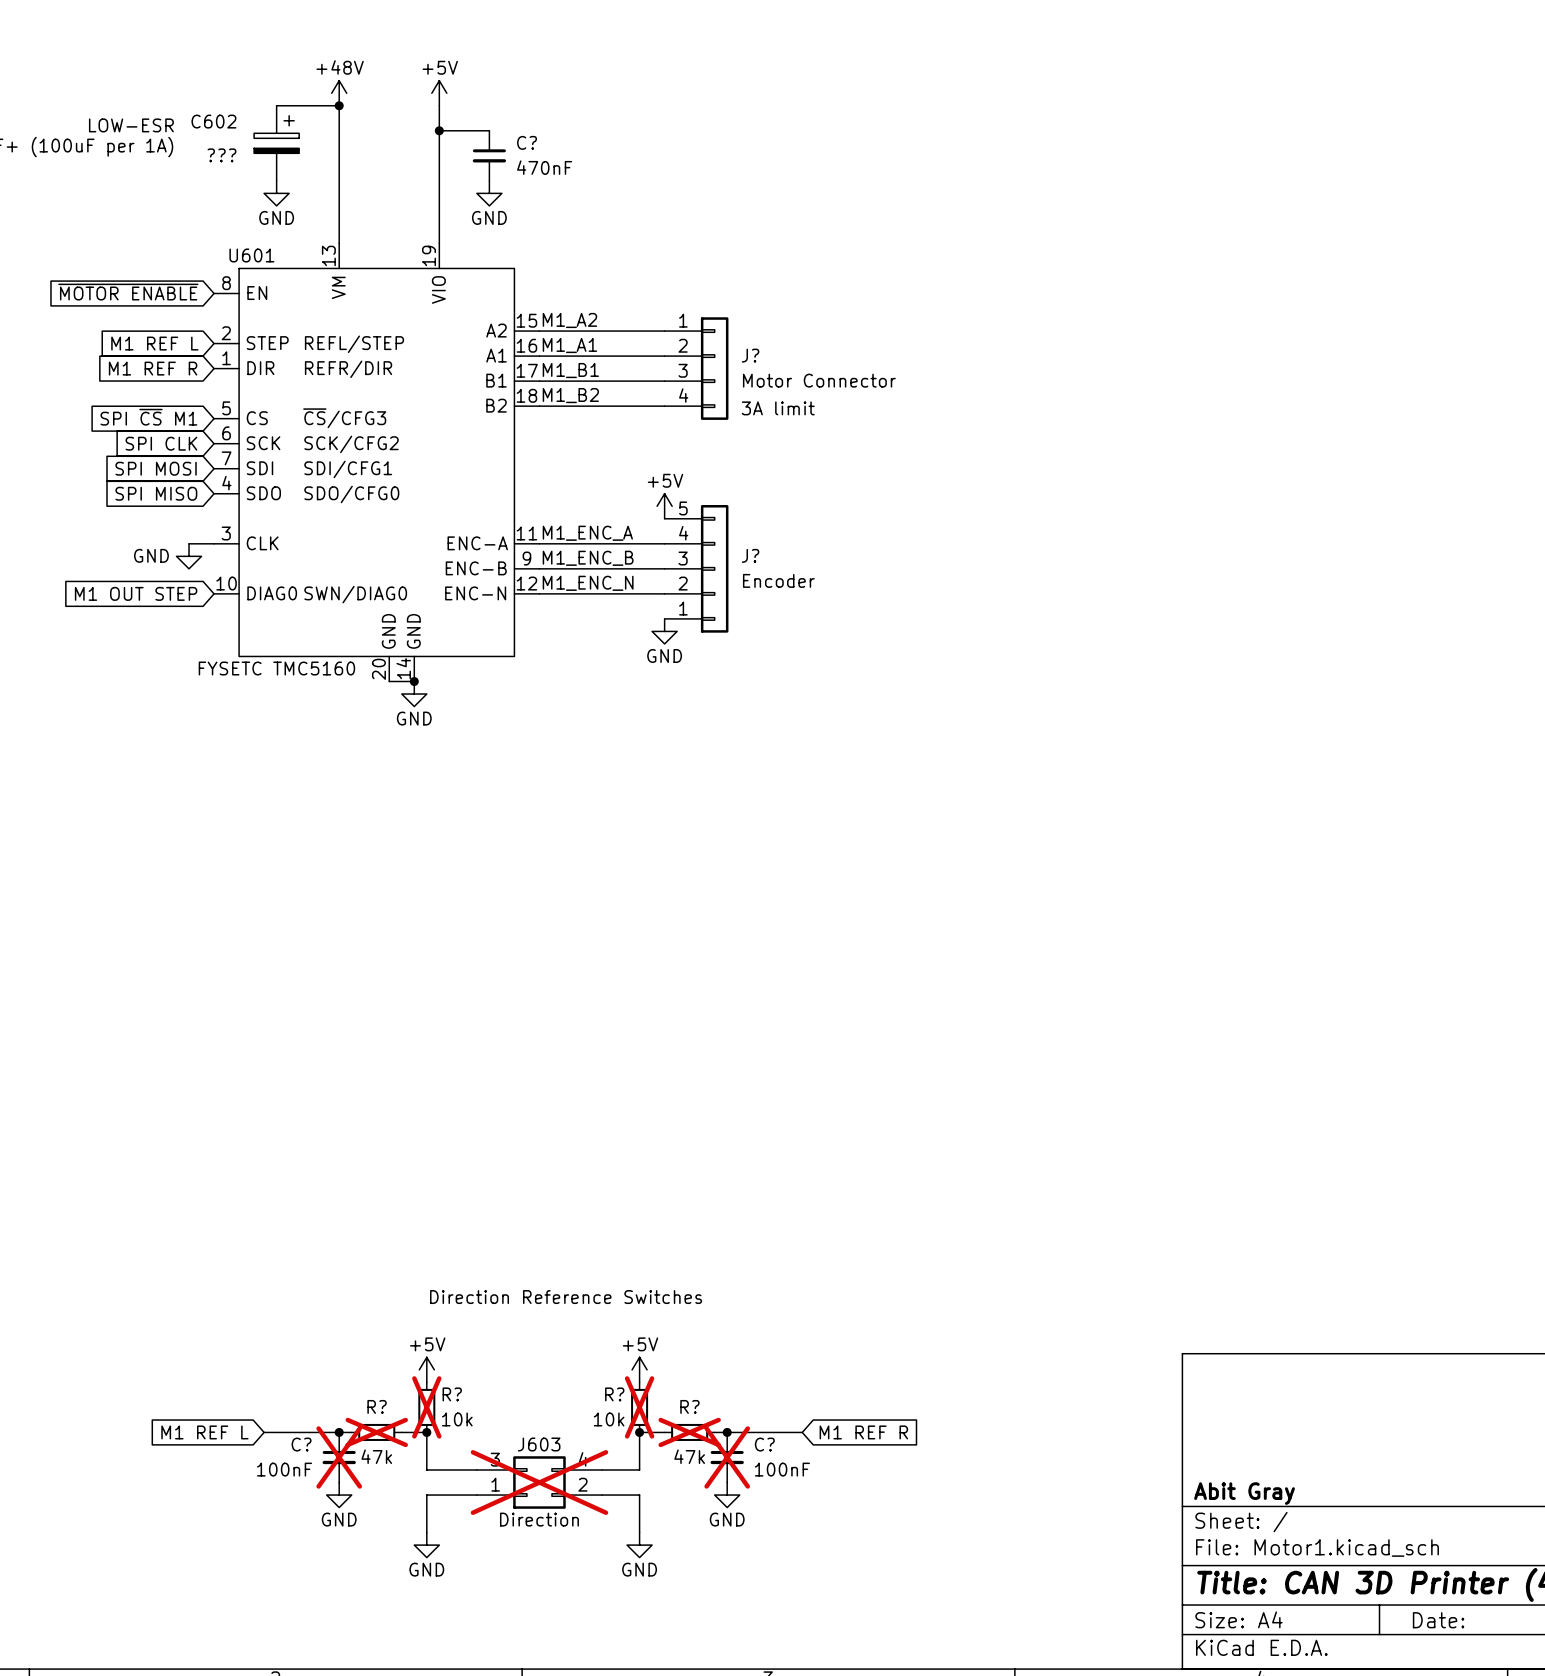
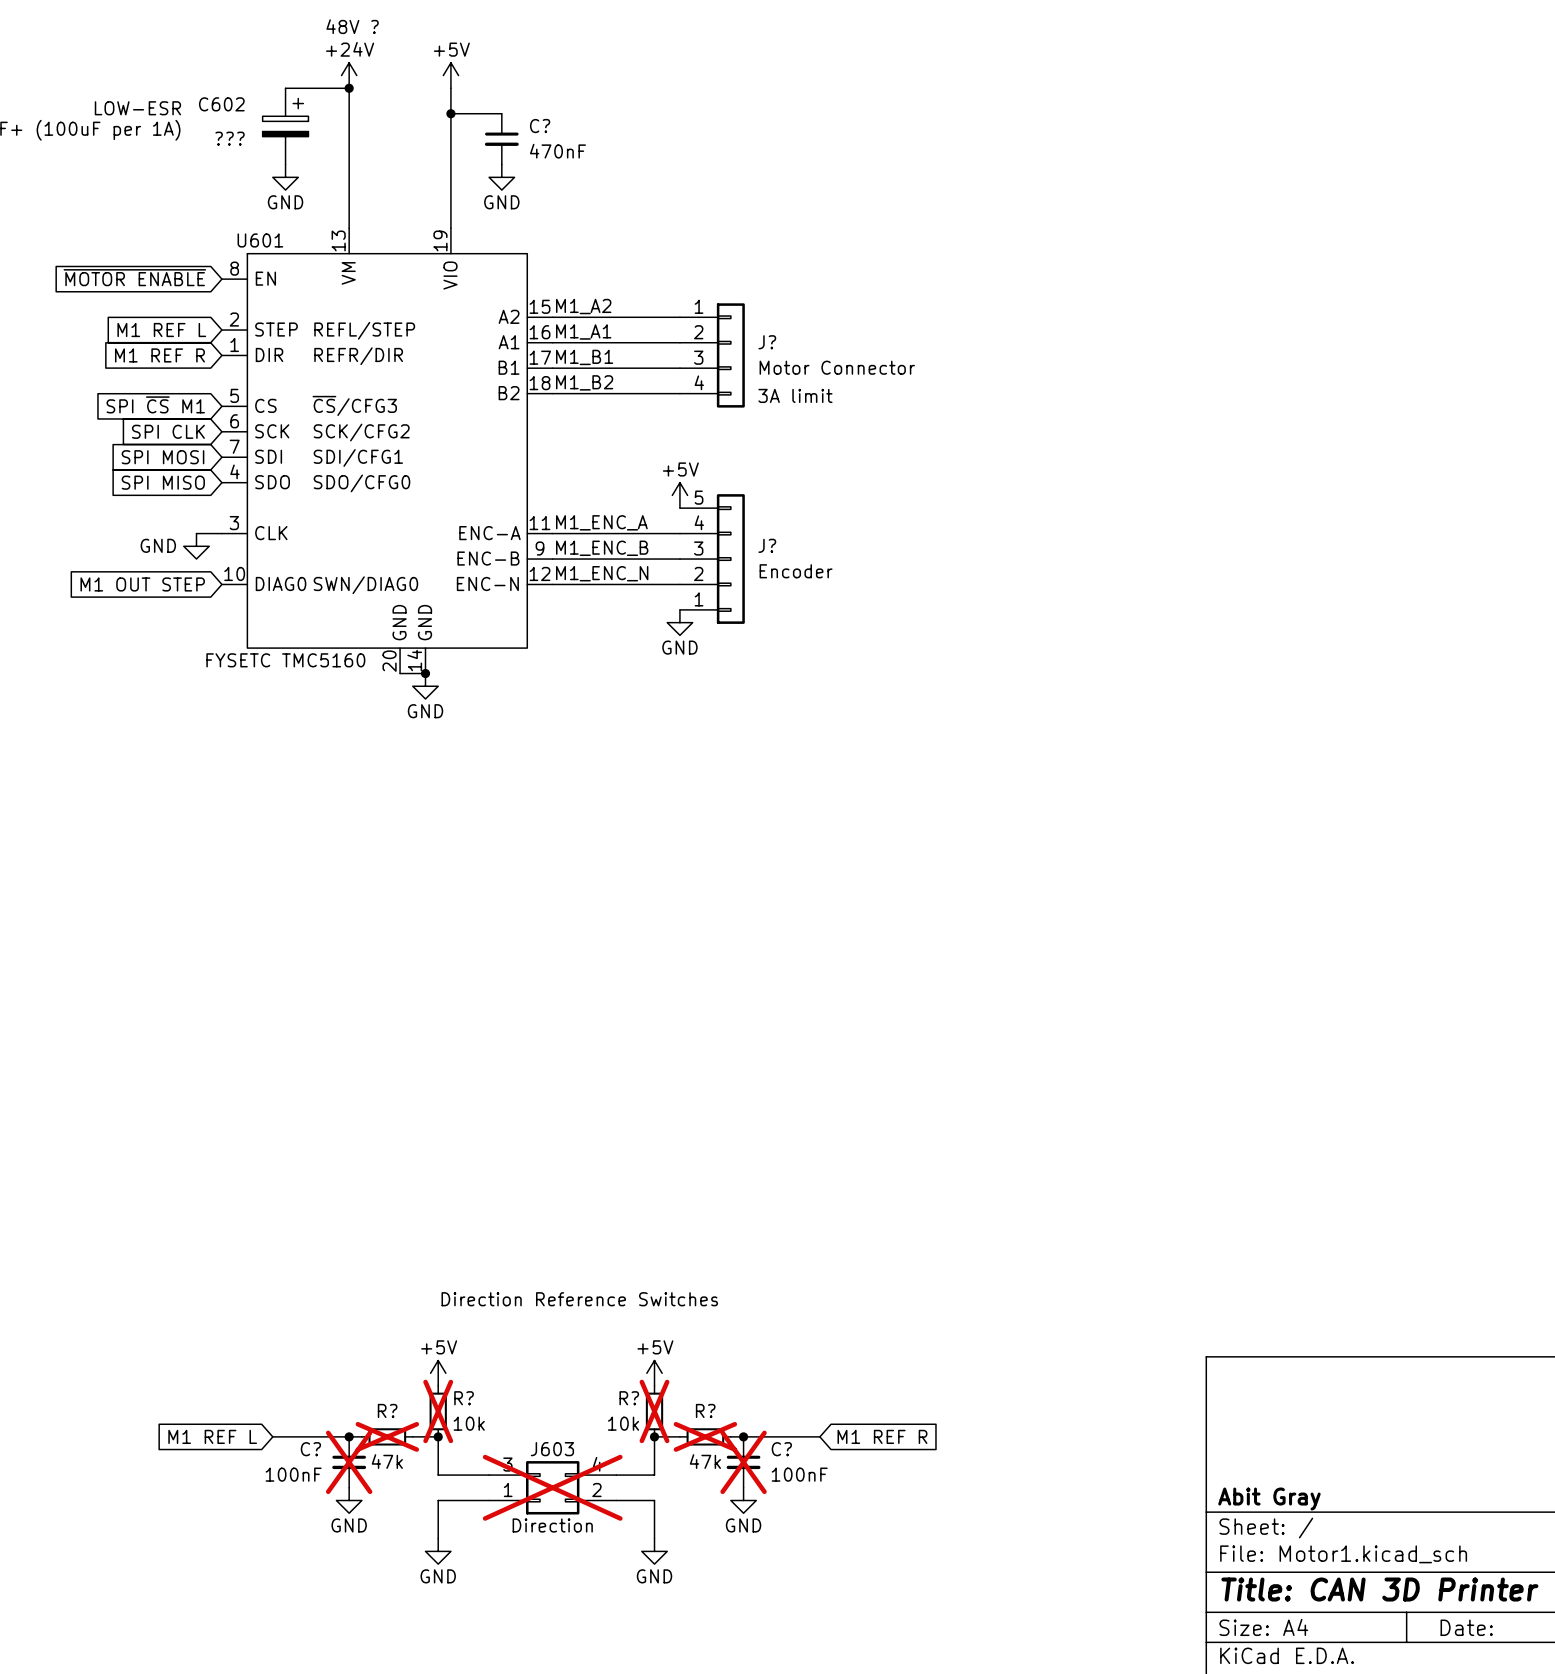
text: none -> 48V ? (352, 26)
power symbol: +48V (339, 93) -> +24V (349, 75)

